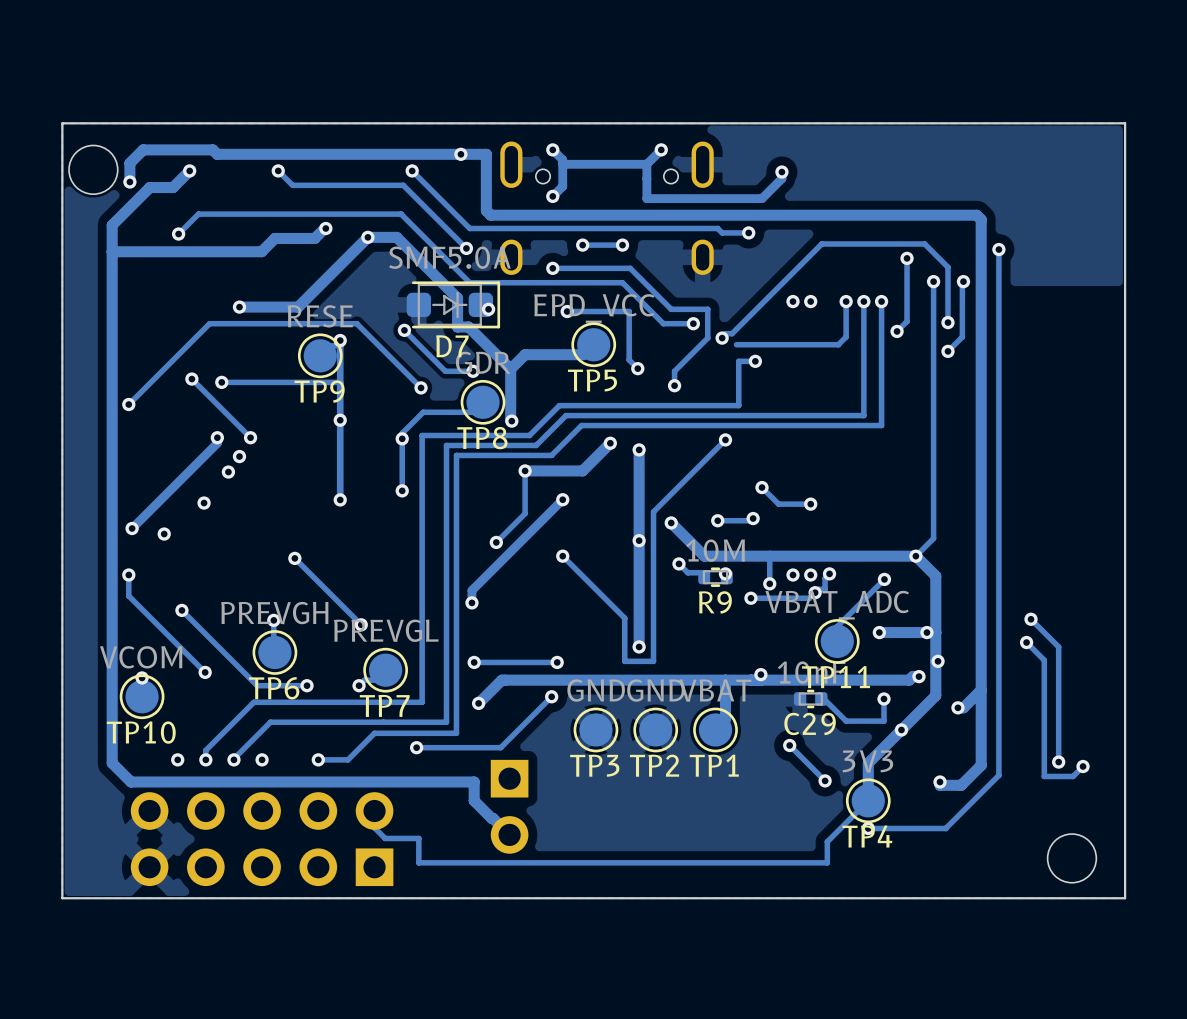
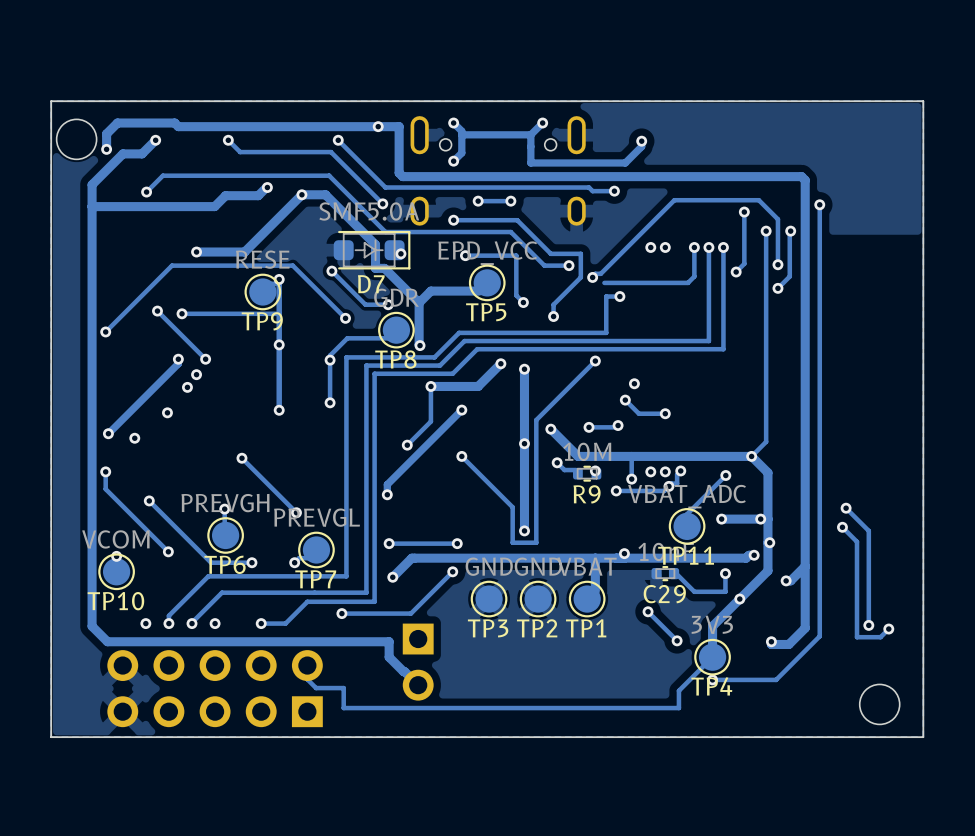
via: none -> (634, 383)

